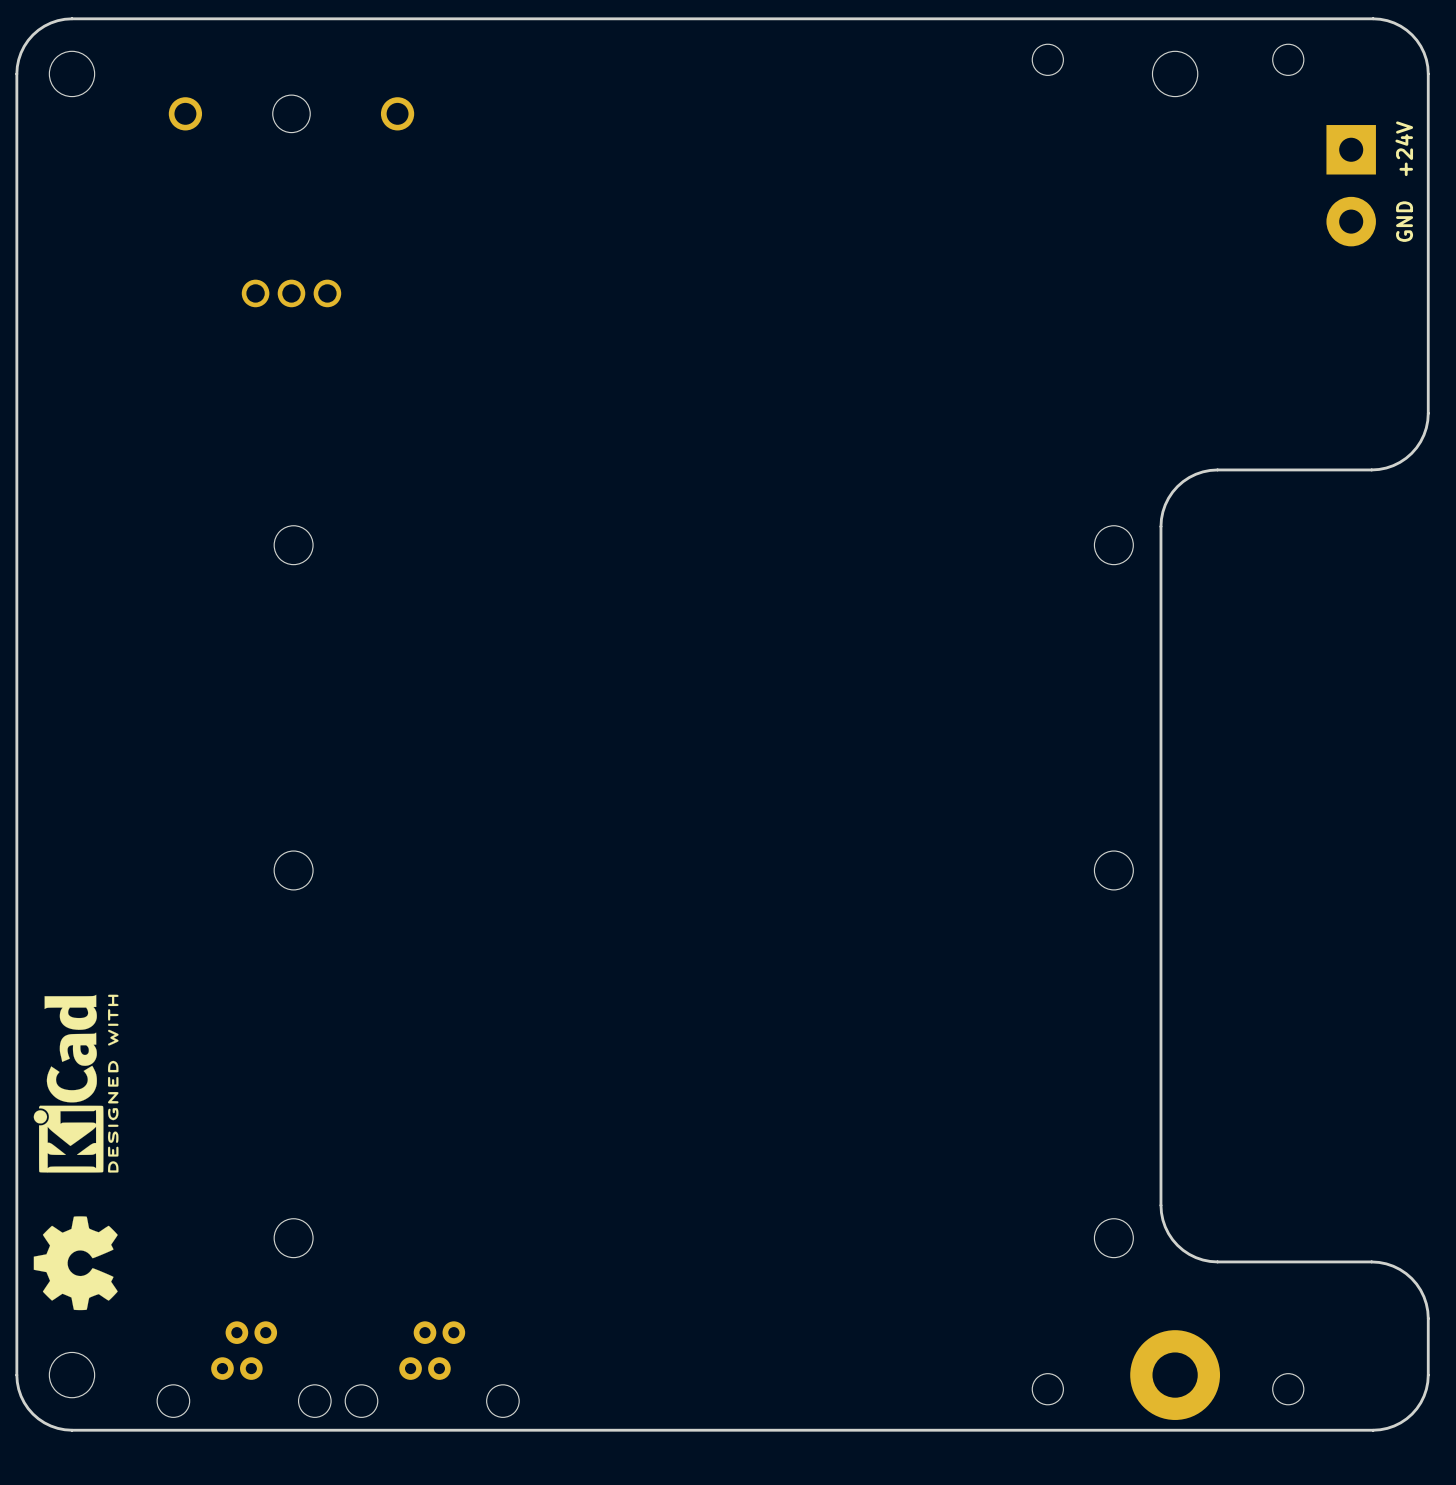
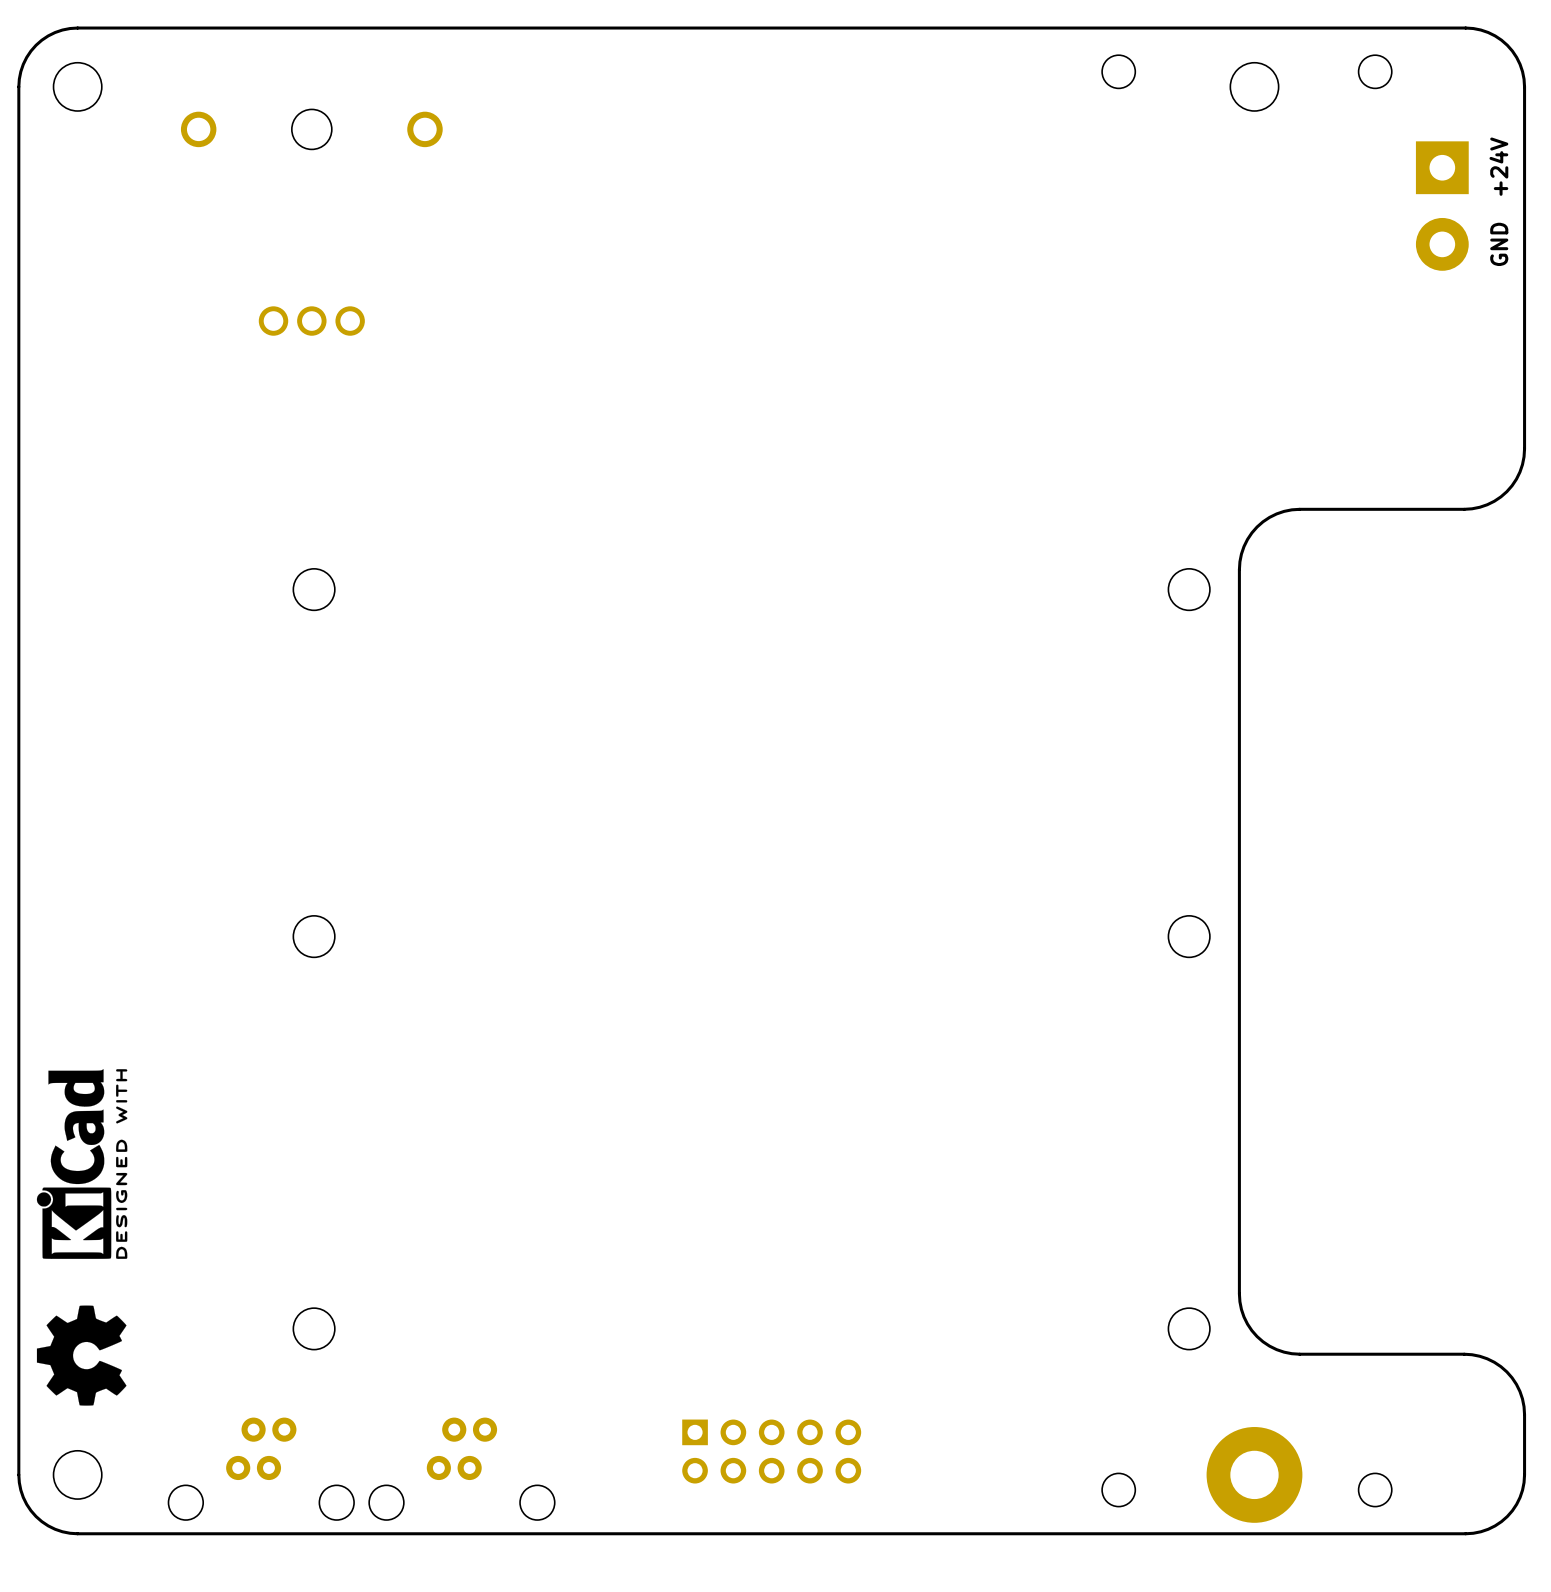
part: none -> (771, 1451)

